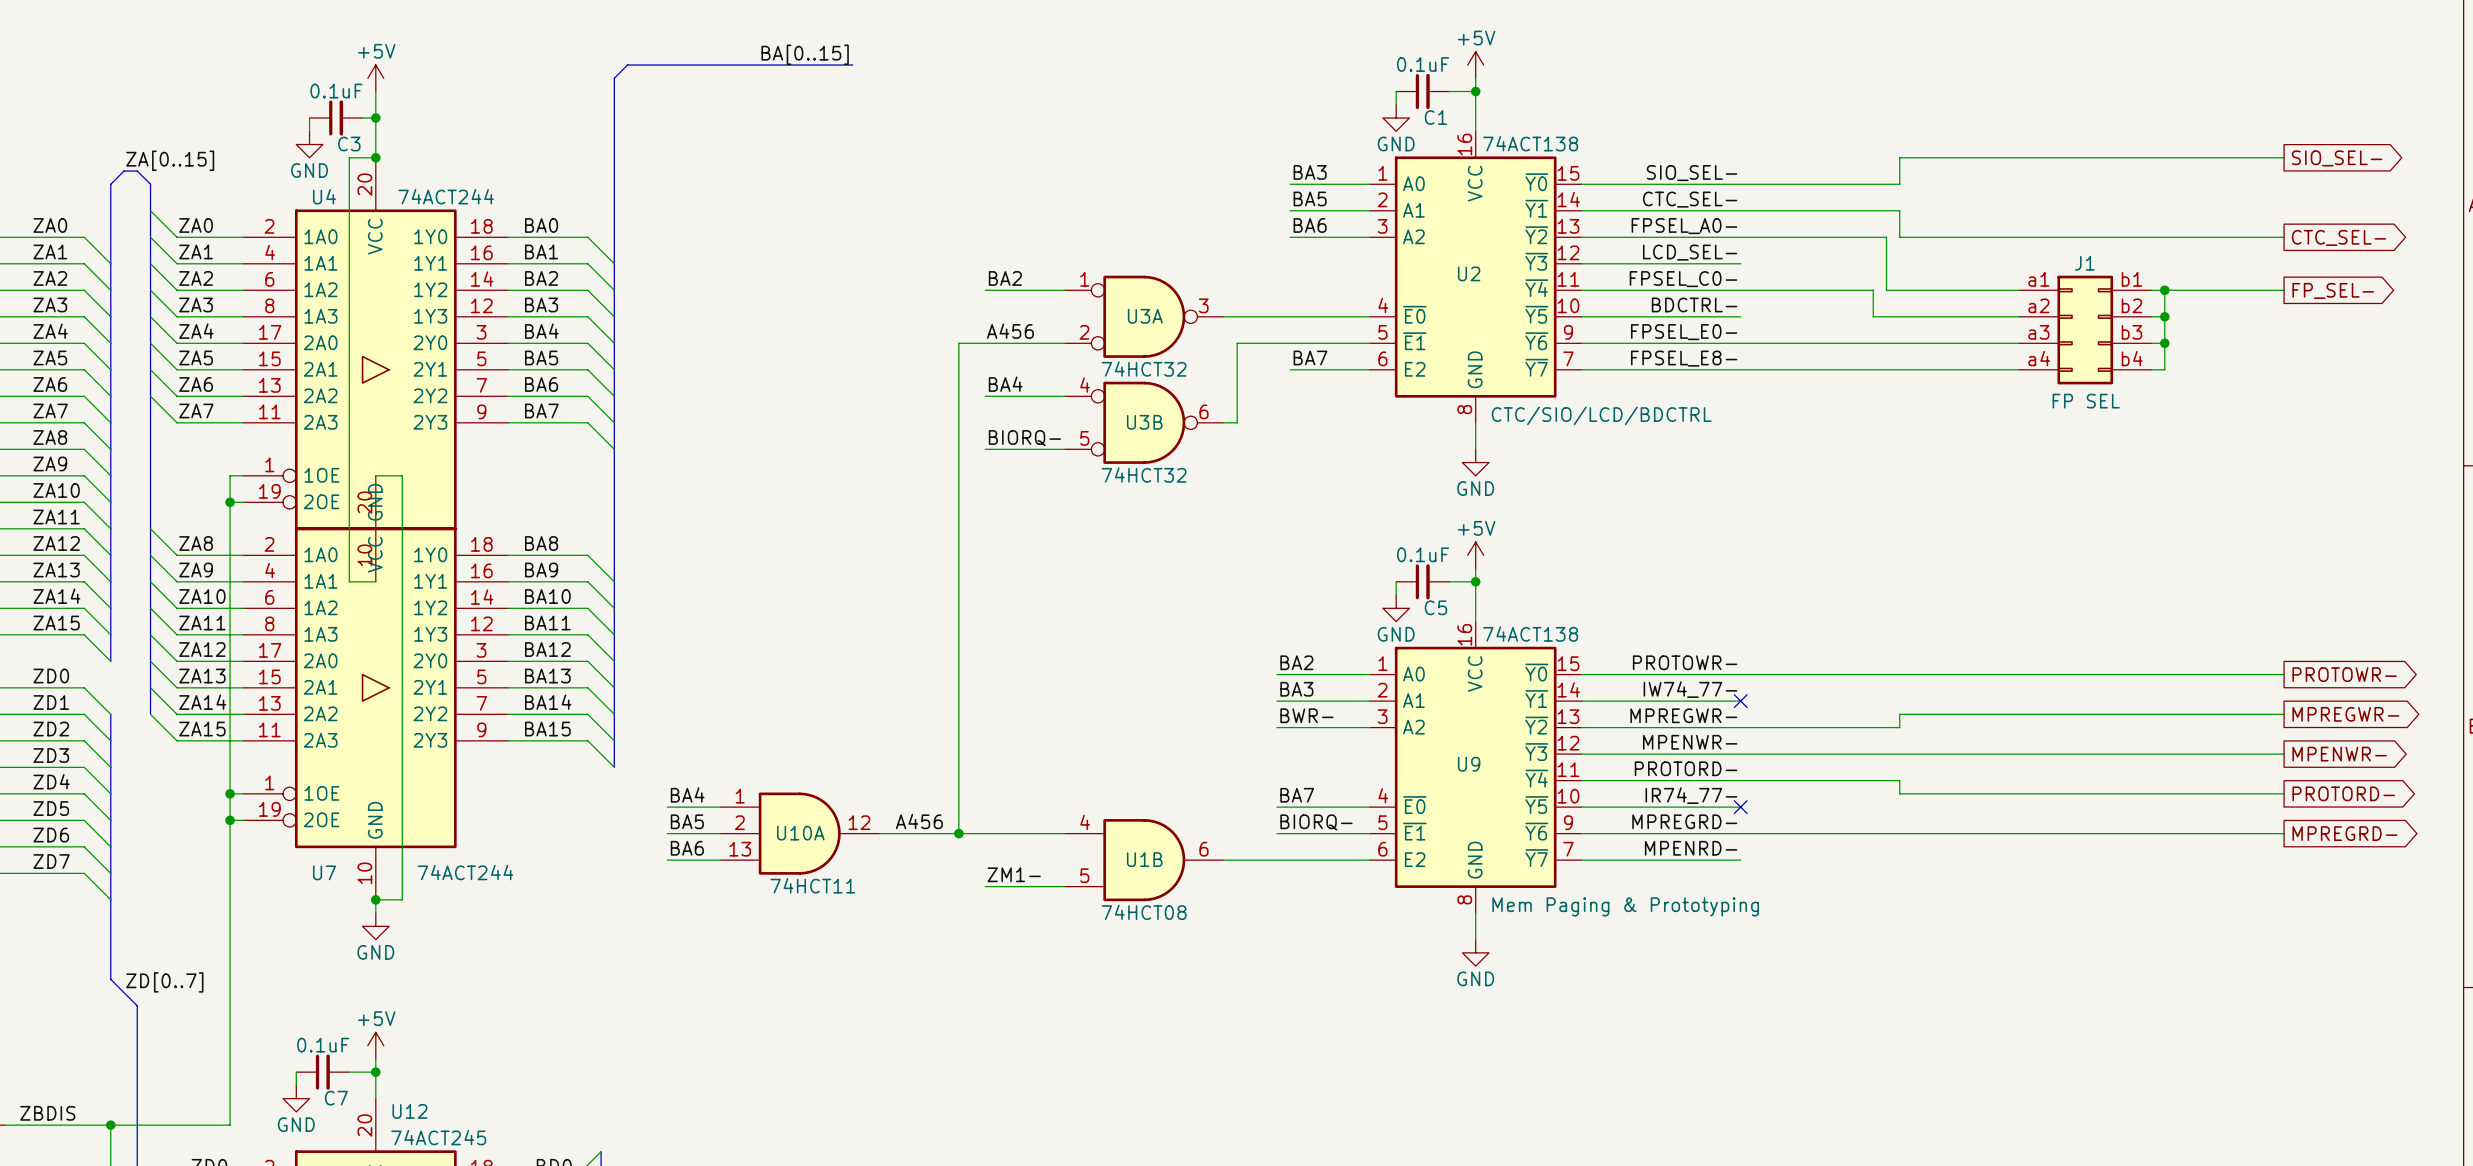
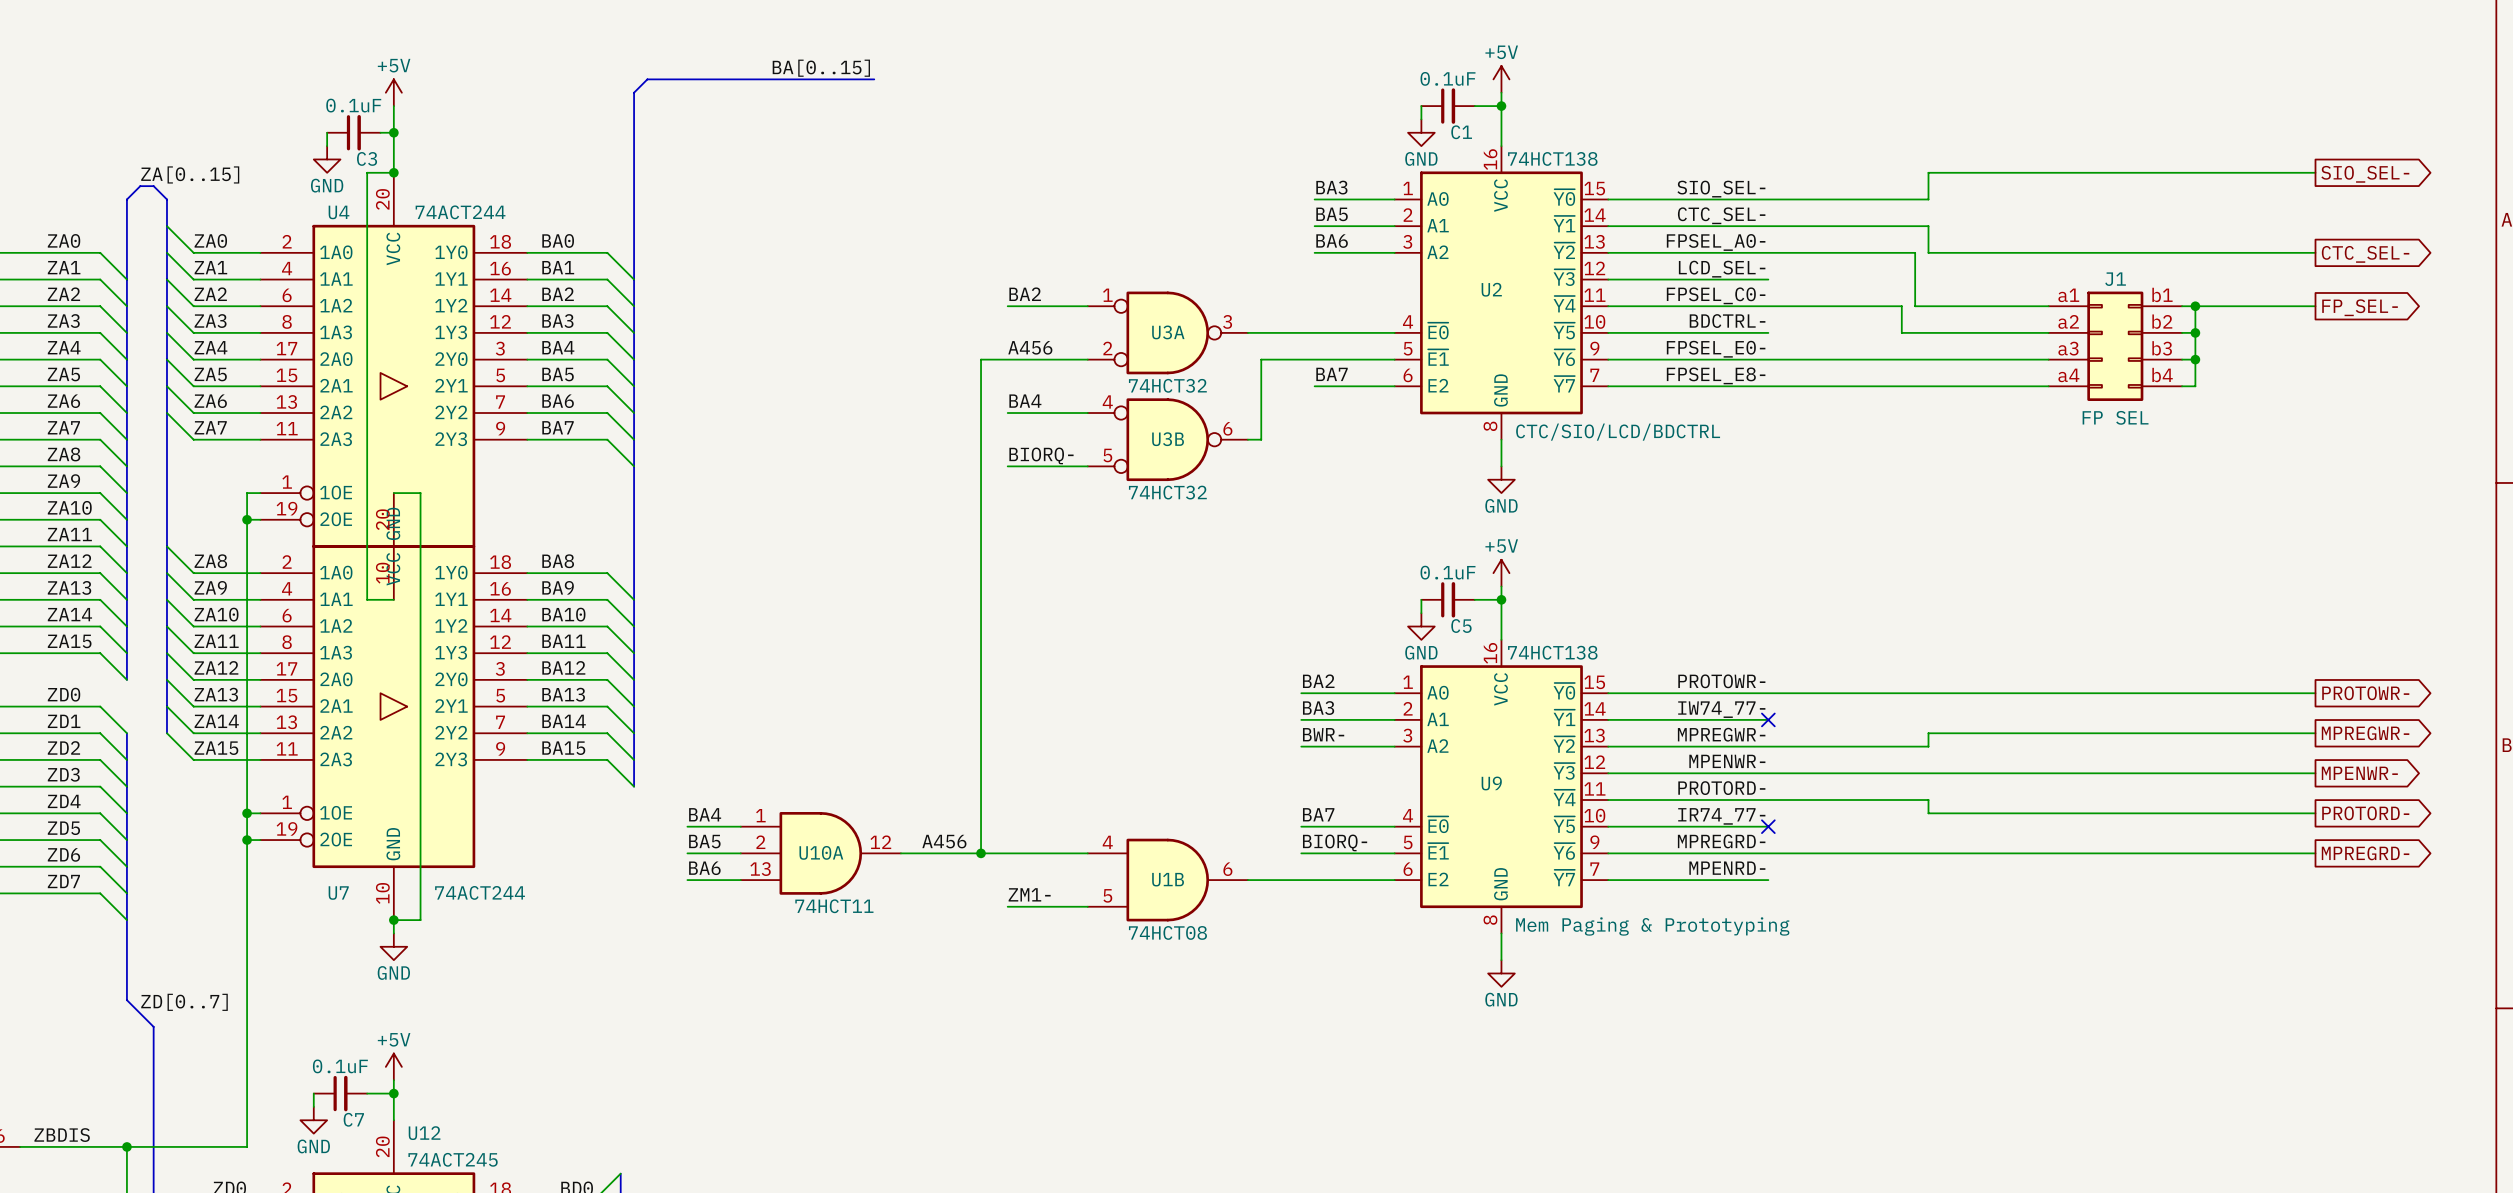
U2 value: 74ACT138 (1530, 143) -> 74HCT138 (1552, 158)
U9 value: 74ACT138 (1530, 634) -> 74HCT138 (1552, 652)

